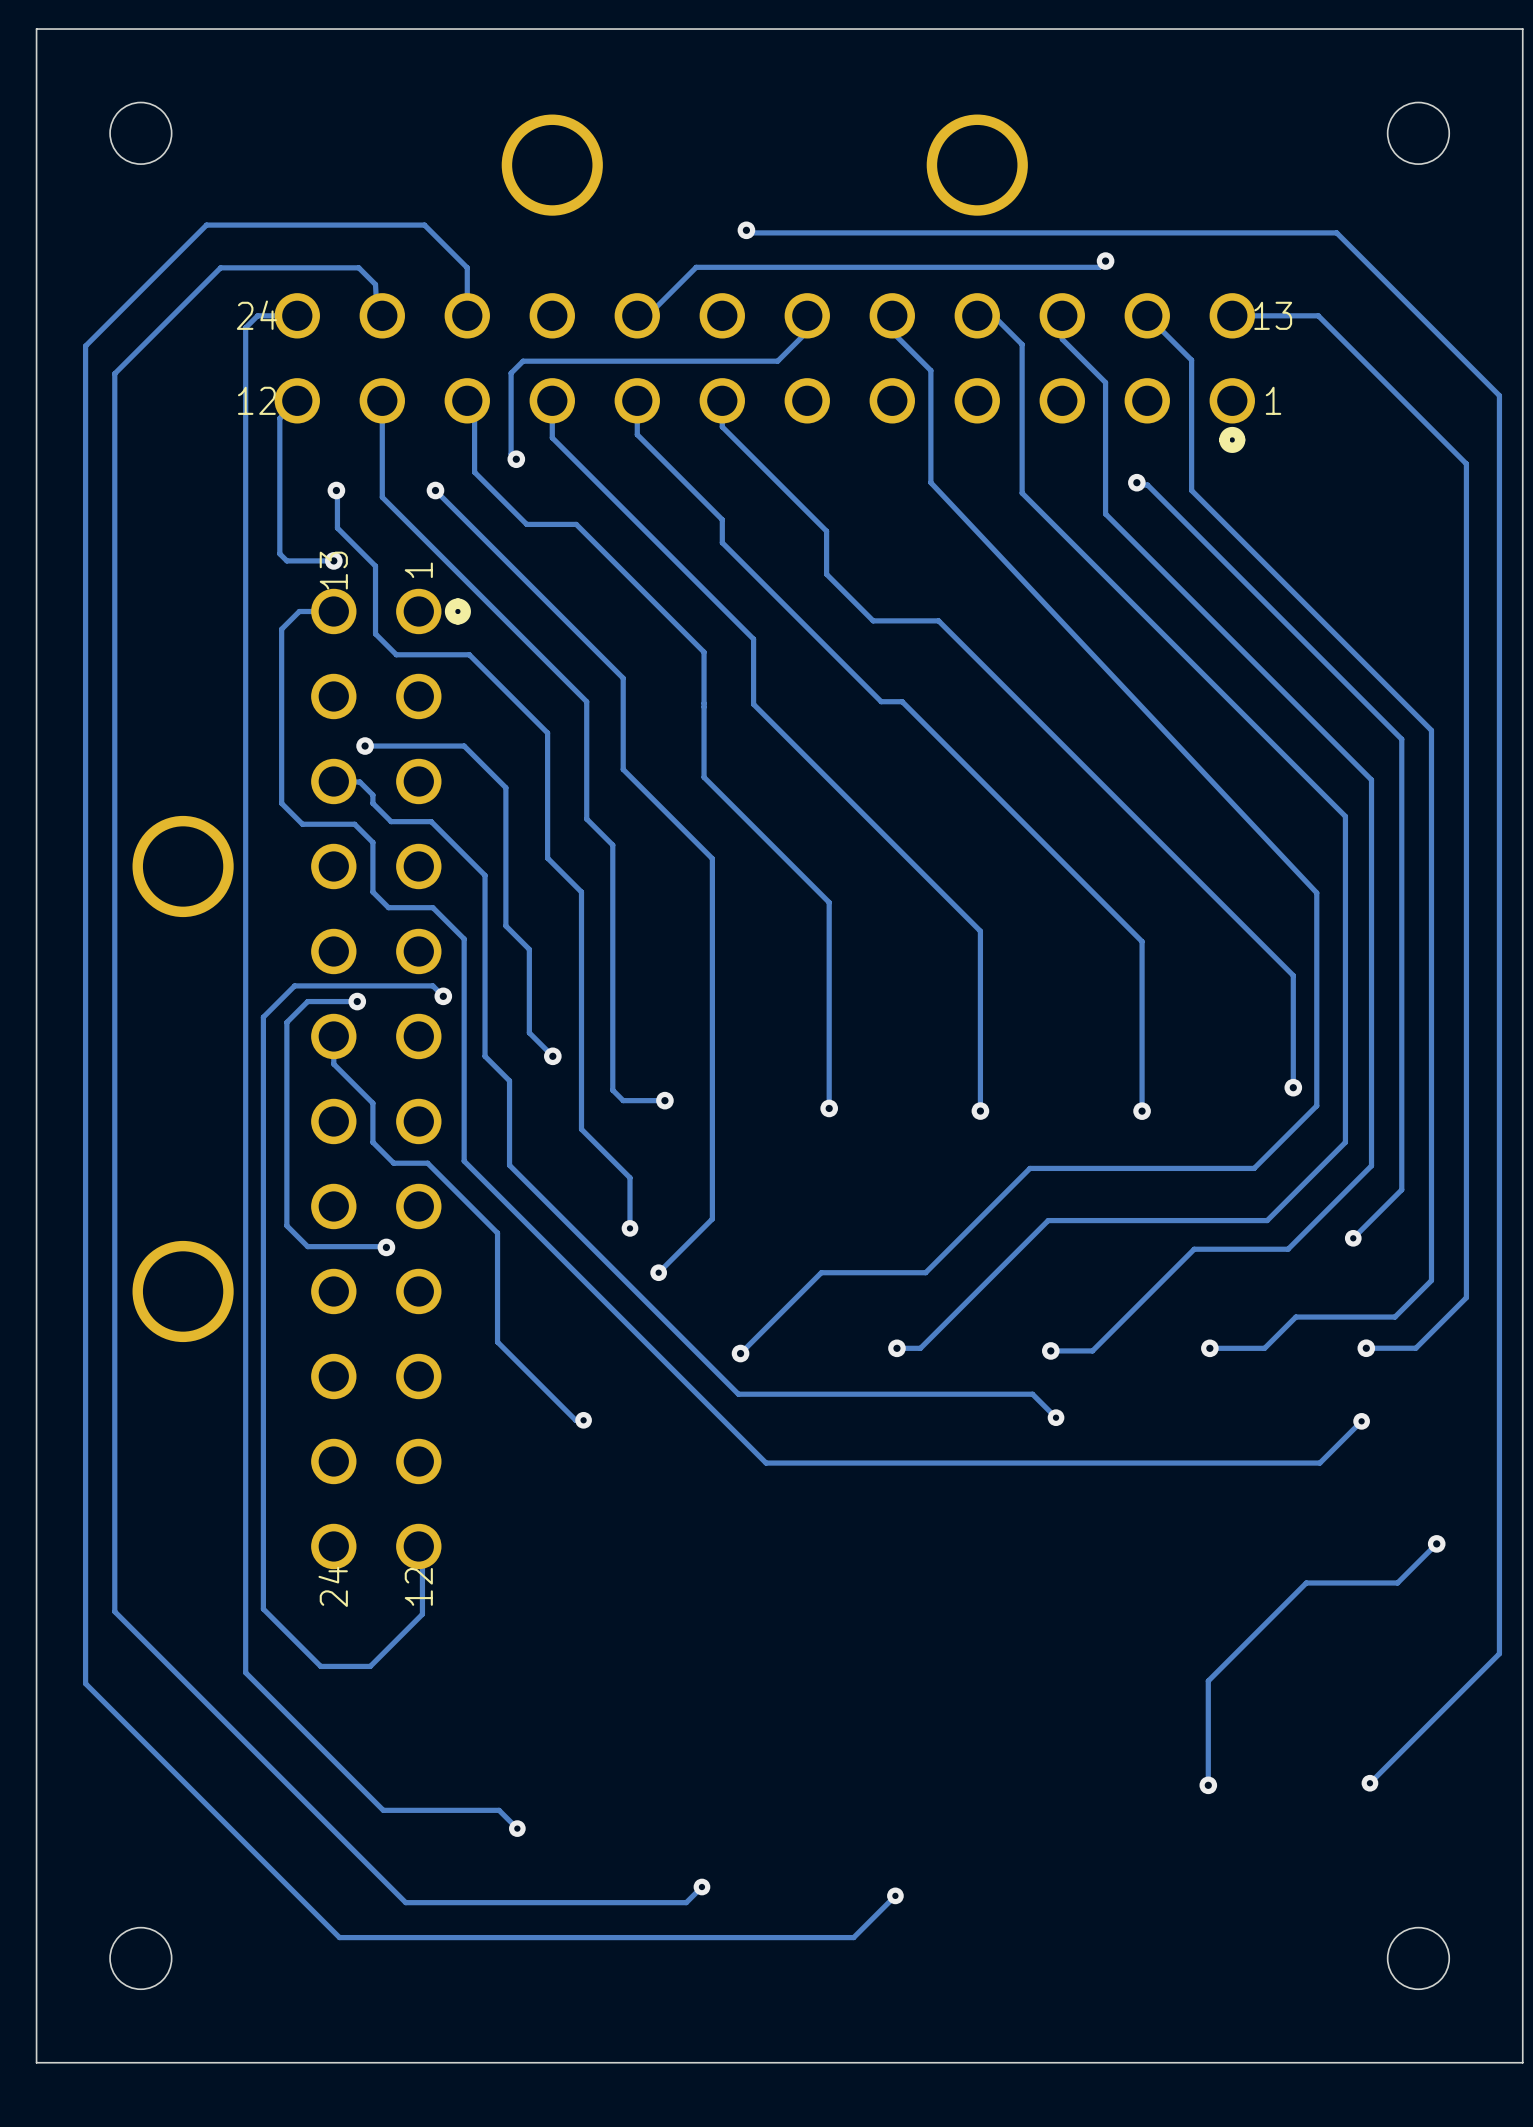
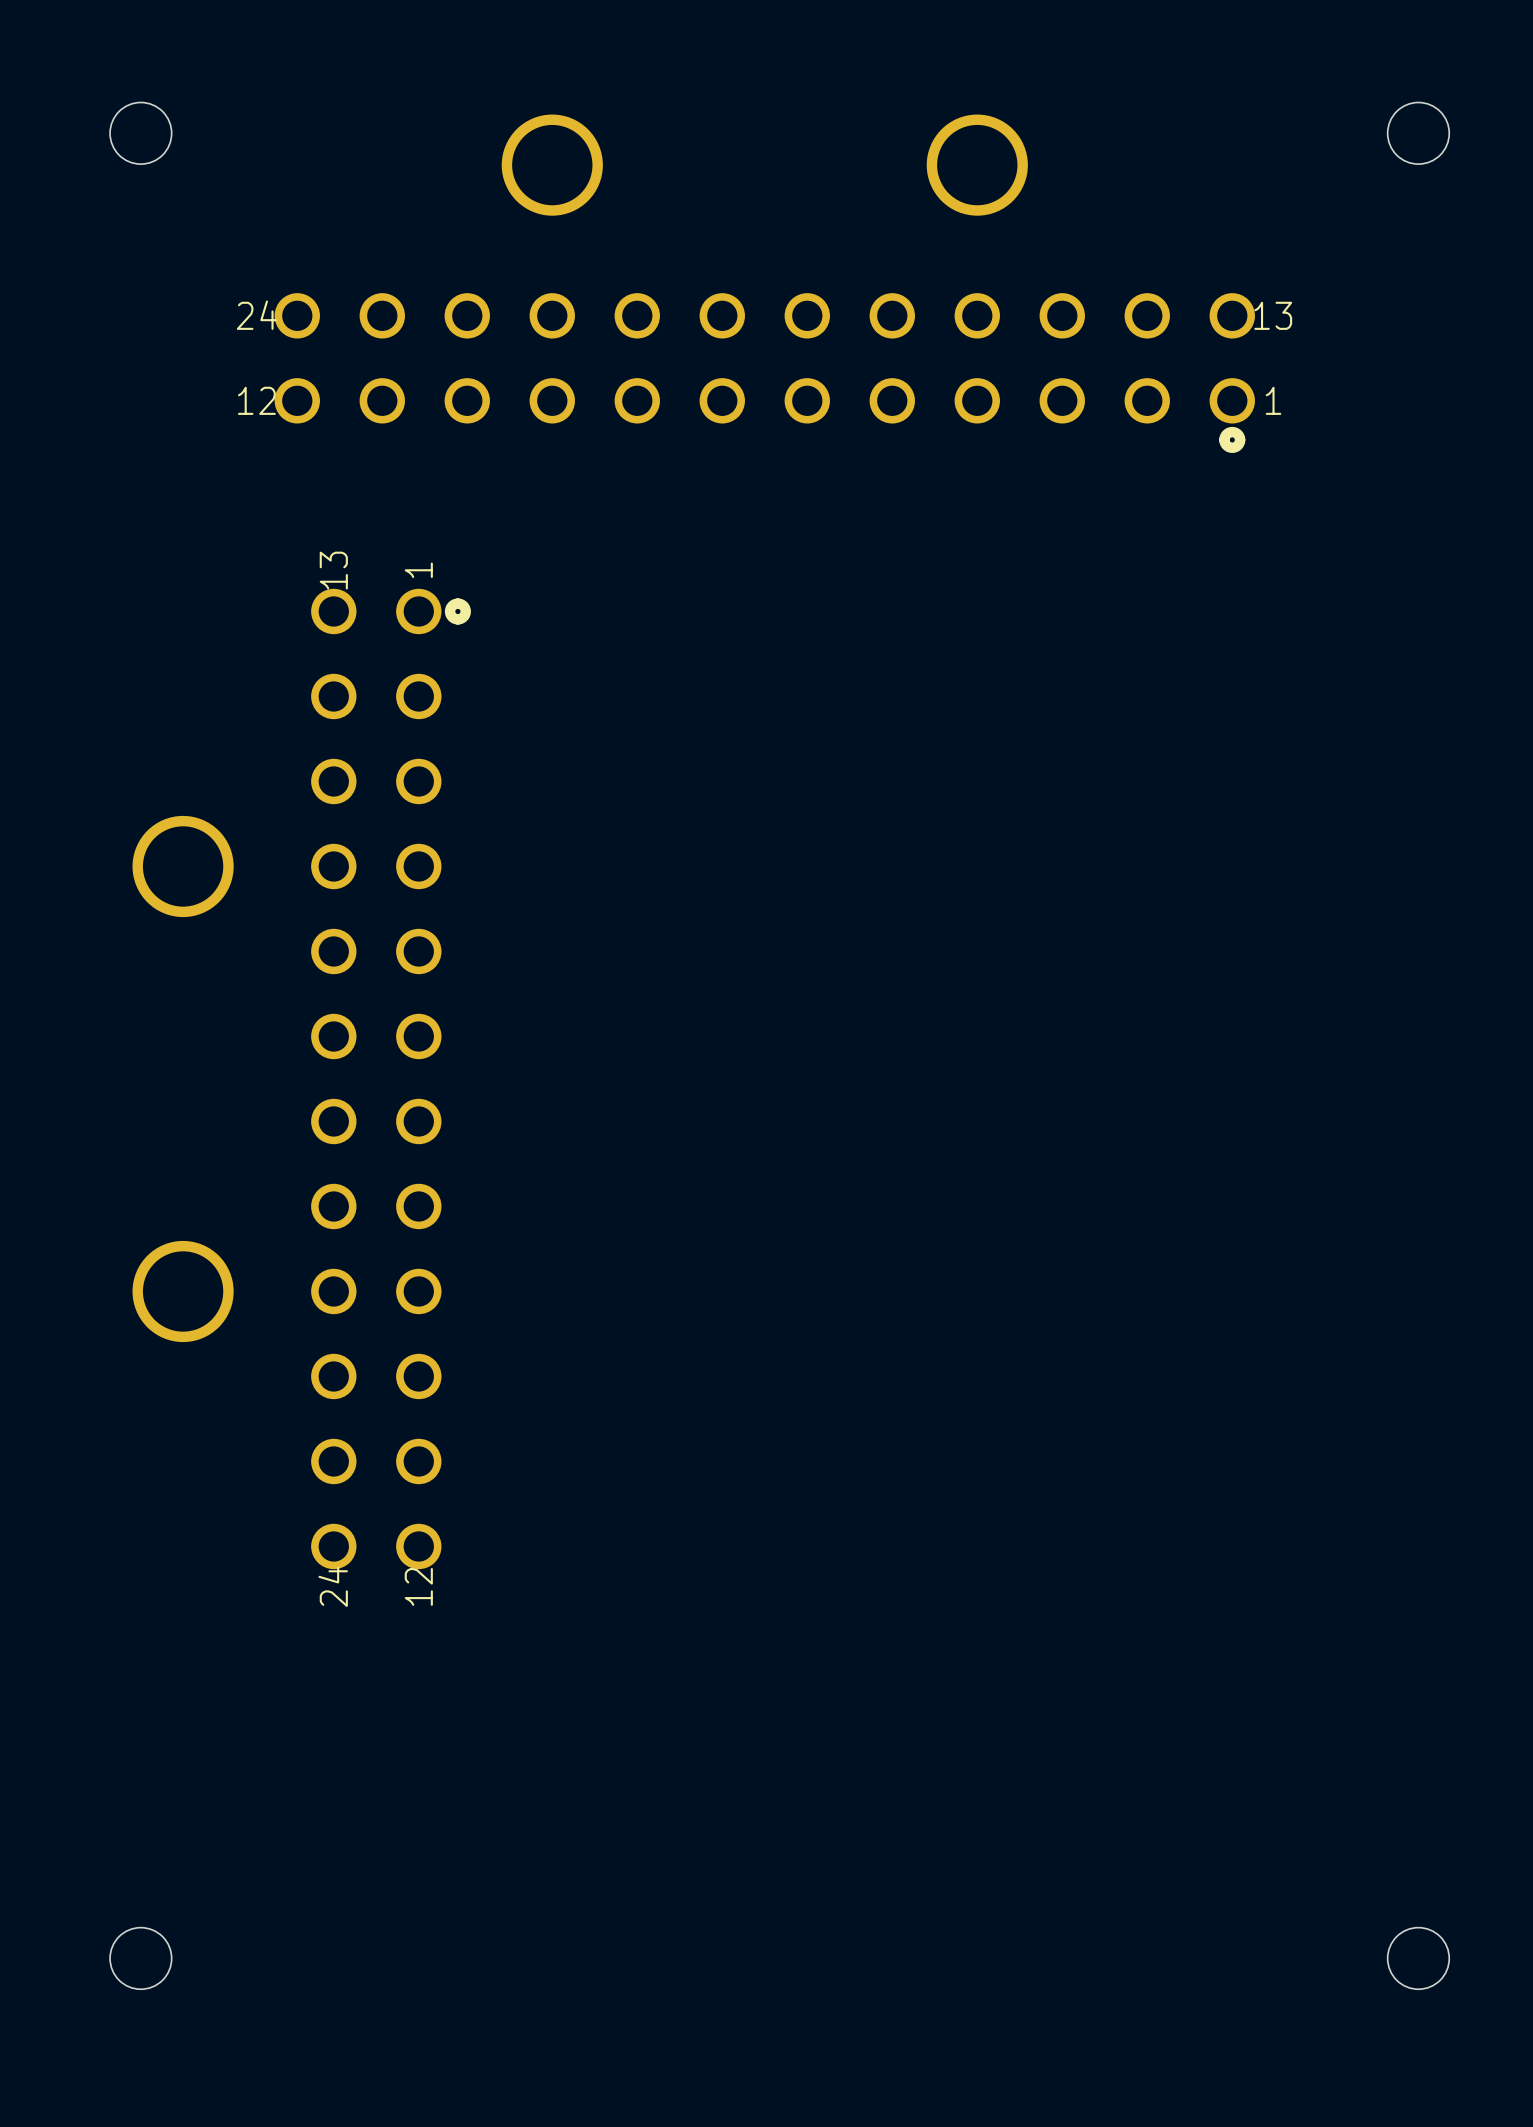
board edge: (1522, 29) (36, 29) (36, 2062) (1522, 2062) (1522, 29) -> none
track: (746, 230) (749, 232) (1336, 232) (1499, 395) (1499, 1653) (1369, 1783) -> none
via: (746, 230) -> none
track: (1105, 261) (1099, 267) (696, 267) (647, 315) (637, 315) -> none
via: (1105, 261) -> none
track: (297, 315) (257, 315) (245, 327) (245, 1672) (383, 1810) (499, 1810) (517, 1828) -> none
track: (382, 315) (377, 314) (375, 284) (358, 267) (220, 267) (114, 373) (114, 1611) (405, 1902) (686, 1902) (701, 1887) -> none
track: (467, 315) (467, 267) (424, 225) (206, 225) (85, 346) (85, 1683) (339, 1937) (853, 1937) (895, 1895) -> none
track: (807, 315) (807, 331) (777, 361) (523, 361) (511, 373) (511, 454) (516, 459) -> none
track: (892, 315) (892, 331) (930, 370) (930, 482) (1316, 892) (1316, 1105) (1254, 1168) (1029, 1168) (925, 1272) (821, 1272) (740, 1353) -> none
track: (977, 315) (993, 315) (1022, 344) (1022, 493) (1345, 816) (1345, 1142) (1267, 1220) (1048, 1220) (920, 1348) (896, 1348) -> none
track: (1062, 315) (1062, 339) (1105, 382) (1105, 513) (1371, 779) (1371, 1165) (1288, 1249) (1194, 1249) (1092, 1350) (1050, 1350) -> none
track: (1147, 315) (1191, 360) (1191, 490) (1431, 730) (1431, 1280) (1394, 1317) (1295, 1317) (1264, 1348) (1209, 1348) -> none
track: (1232, 315) (1318, 315) (1466, 463) (1466, 1297) (1415, 1348) (1366, 1348) -> none
track: (297, 400) (279, 418) (279, 553) (286, 560) (333, 560) -> none
track: (382, 400) (382, 497) (586, 701) (586, 819) (612, 845) (612, 1090) (623, 1100) (664, 1100) -> none
track: (467, 400) (474, 408) (474, 472) (526, 524) (576, 524) (704, 652) (704, 777) (829, 902) (829, 1108) -> none
track: (552, 400) (552, 437) (753, 639) (753, 704) (980, 931) (980, 1111) -> none
track: (637, 400) (637, 434) (722, 519) (722, 542) (881, 701) (902, 701) (1142, 941) (1142, 1111) -> none
track: (722, 400) (722, 426) (826, 531) (826, 574) (873, 620) (938, 620) (1293, 975) (1293, 1087) -> none
via: (516, 459) -> none
track: (1136, 482) (1139, 485) (1147, 485) (1401, 739) (1401, 1189) (1353, 1238) -> none
via: (1136, 482) -> none
track: (336, 490) (337, 528) (375, 566) (375, 633) (396, 654) (469, 654) (547, 732) (547, 858) (581, 892) (581, 1129) (629, 1177) (629, 1228) -> none
via: (336, 490) -> none
track: (435, 490) (623, 678) (623, 769) (712, 858) (712, 1219) (658, 1272) -> none
via: (435, 490) -> none
via: (333, 560) -> none
track: (333, 611) (299, 611) (281, 629) (281, 803) (302, 824) (354, 824) (372, 842) (372, 892) (388, 907) (432, 907) (464, 938) (464, 1161) (766, 1463) (1319, 1463) (1361, 1421) -> none
track: (365, 746) (464, 746) (505, 787) (505, 925) (529, 949) (529, 1032) (552, 1056) -> none
via: (365, 746) -> none
track: (333, 781) (359, 782) (372, 795) (372, 803) (391, 821) (431, 821) (485, 875) (485, 1056) (509, 1080) (509, 1165) (738, 1394) (1032, 1394) (1056, 1417) -> none
track: (443, 996) (432, 985) (294, 985) (263, 1017) (263, 1609) (320, 1666) (370, 1666) (422, 1614) (422, 1550) (418, 1546) -> none
via: (443, 996) -> none
track: (357, 1001) (307, 1001) (286, 1022) (286, 1225) (307, 1246) (386, 1247) -> none
via: (357, 1001) -> none
track: (333, 1036) (333, 1064) (372, 1103) (372, 1142) (393, 1163) (427, 1163) (497, 1233) (497, 1342) (575, 1420) (583, 1420) -> none
via: (552, 1056) -> none
via: (1293, 1087) -> none
via: (664, 1100) -> none
via: (829, 1108) -> none
via: (980, 1111) -> none
via: (1142, 1111) -> none
via: (629, 1228) -> none
via: (1353, 1238) -> none
via: (386, 1247) -> none
via: (658, 1272) -> none
via: (896, 1348) -> none
via: (1209, 1348) -> none
via: (1366, 1348) -> none
via: (1050, 1350) -> none
via: (740, 1353) -> none
via: (1056, 1417) -> none
via: (583, 1420) -> none
via: (1361, 1421) -> none
track: (1436, 1543) (1397, 1582) (1306, 1582) (1208, 1681) (1208, 1785) -> none
via: (1436, 1543) -> none
via: (1369, 1783) -> none
via: (1208, 1785) -> none
via: (517, 1828) -> none
via: (701, 1887) -> none
via: (895, 1895) -> none

